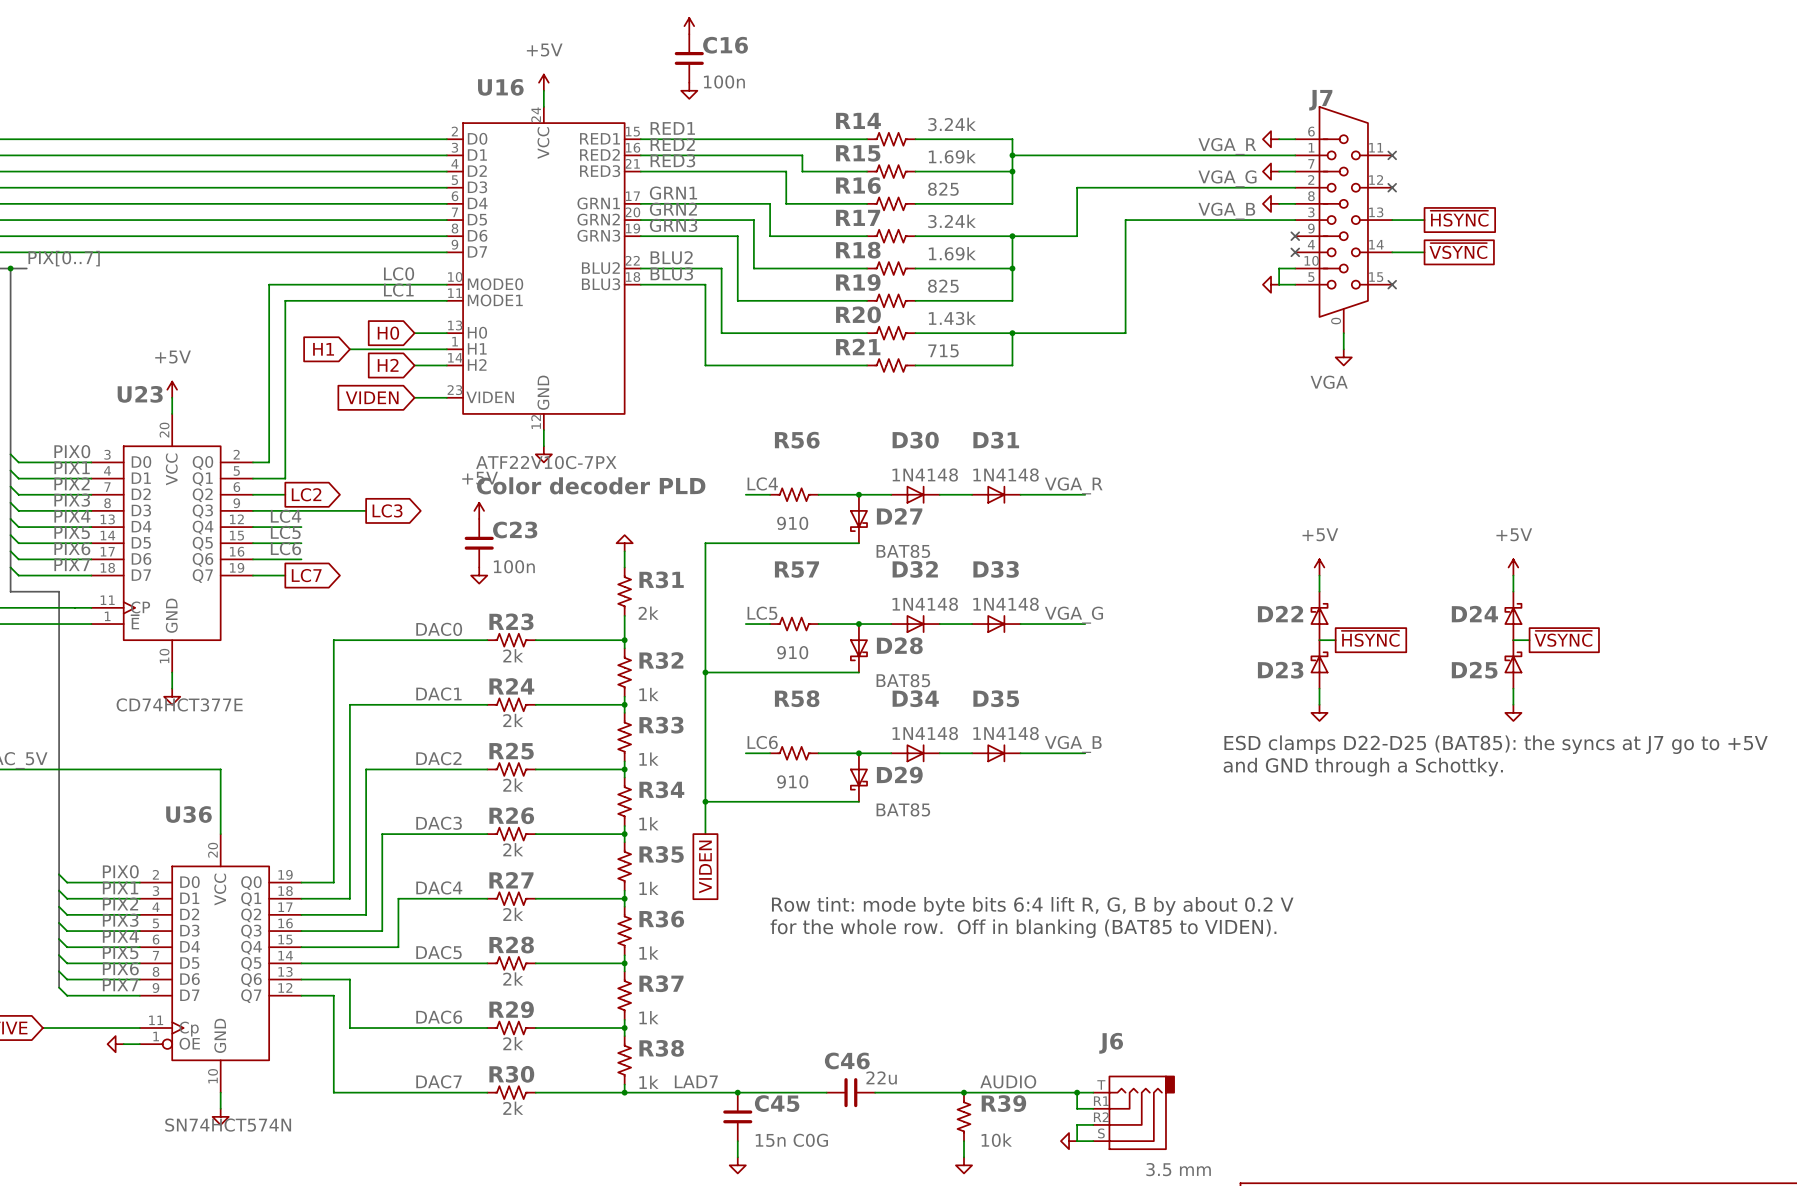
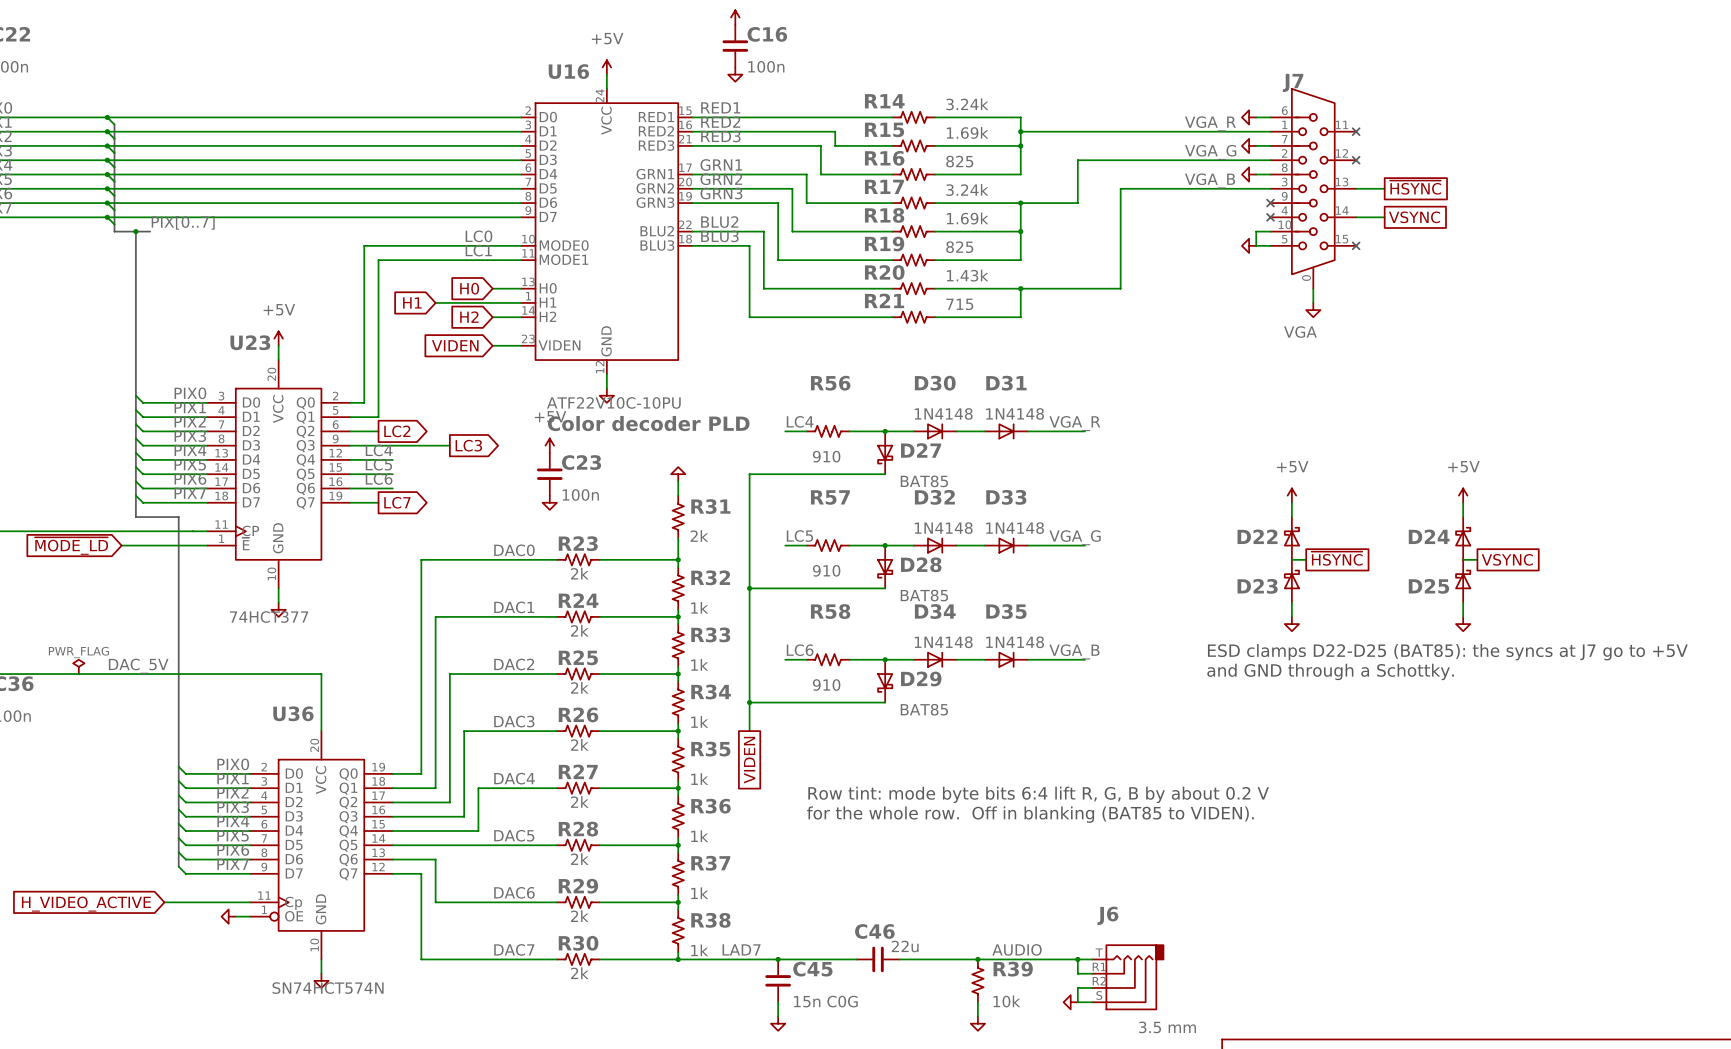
global label: ~{VSYNC} (1458, 251) -> VSYNC (1414, 217)
U16 value: ATF22V10C-7PX (546, 462) -> ATF22V10C-10PU (613, 402)
global label: ~{VSYNC} (1563, 638) -> VSYNC (1507, 559)
U23 value: CD74HCT377E (179, 704) -> 74HCT377 (269, 617)

